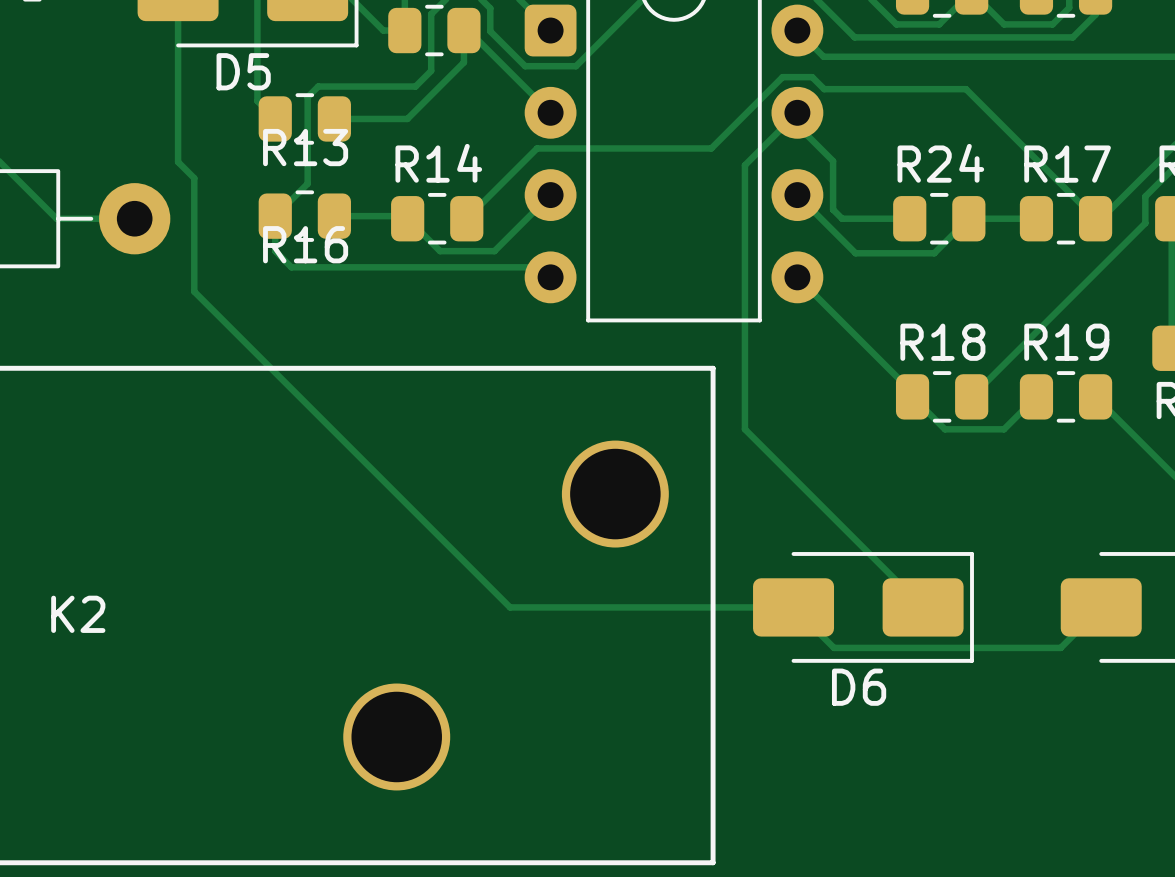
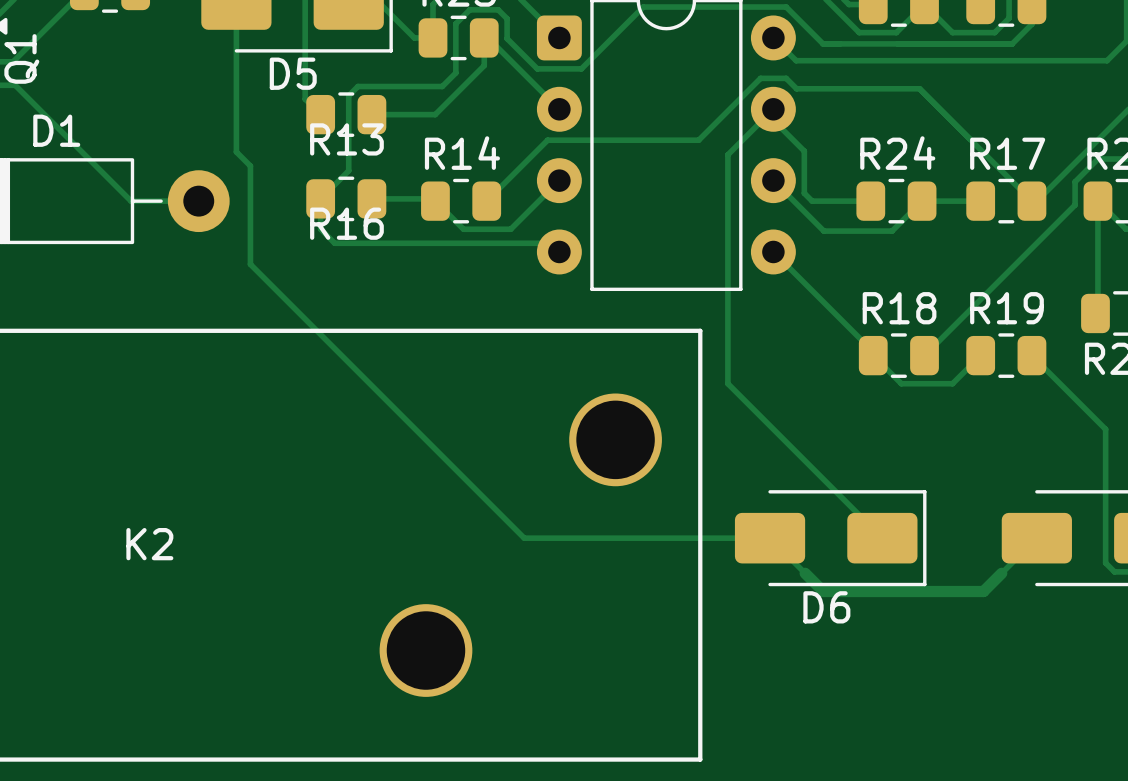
track: (834, 647) (1060, 647) -> (805, 573) (823, 591) (983, 591) (1001, 573)

